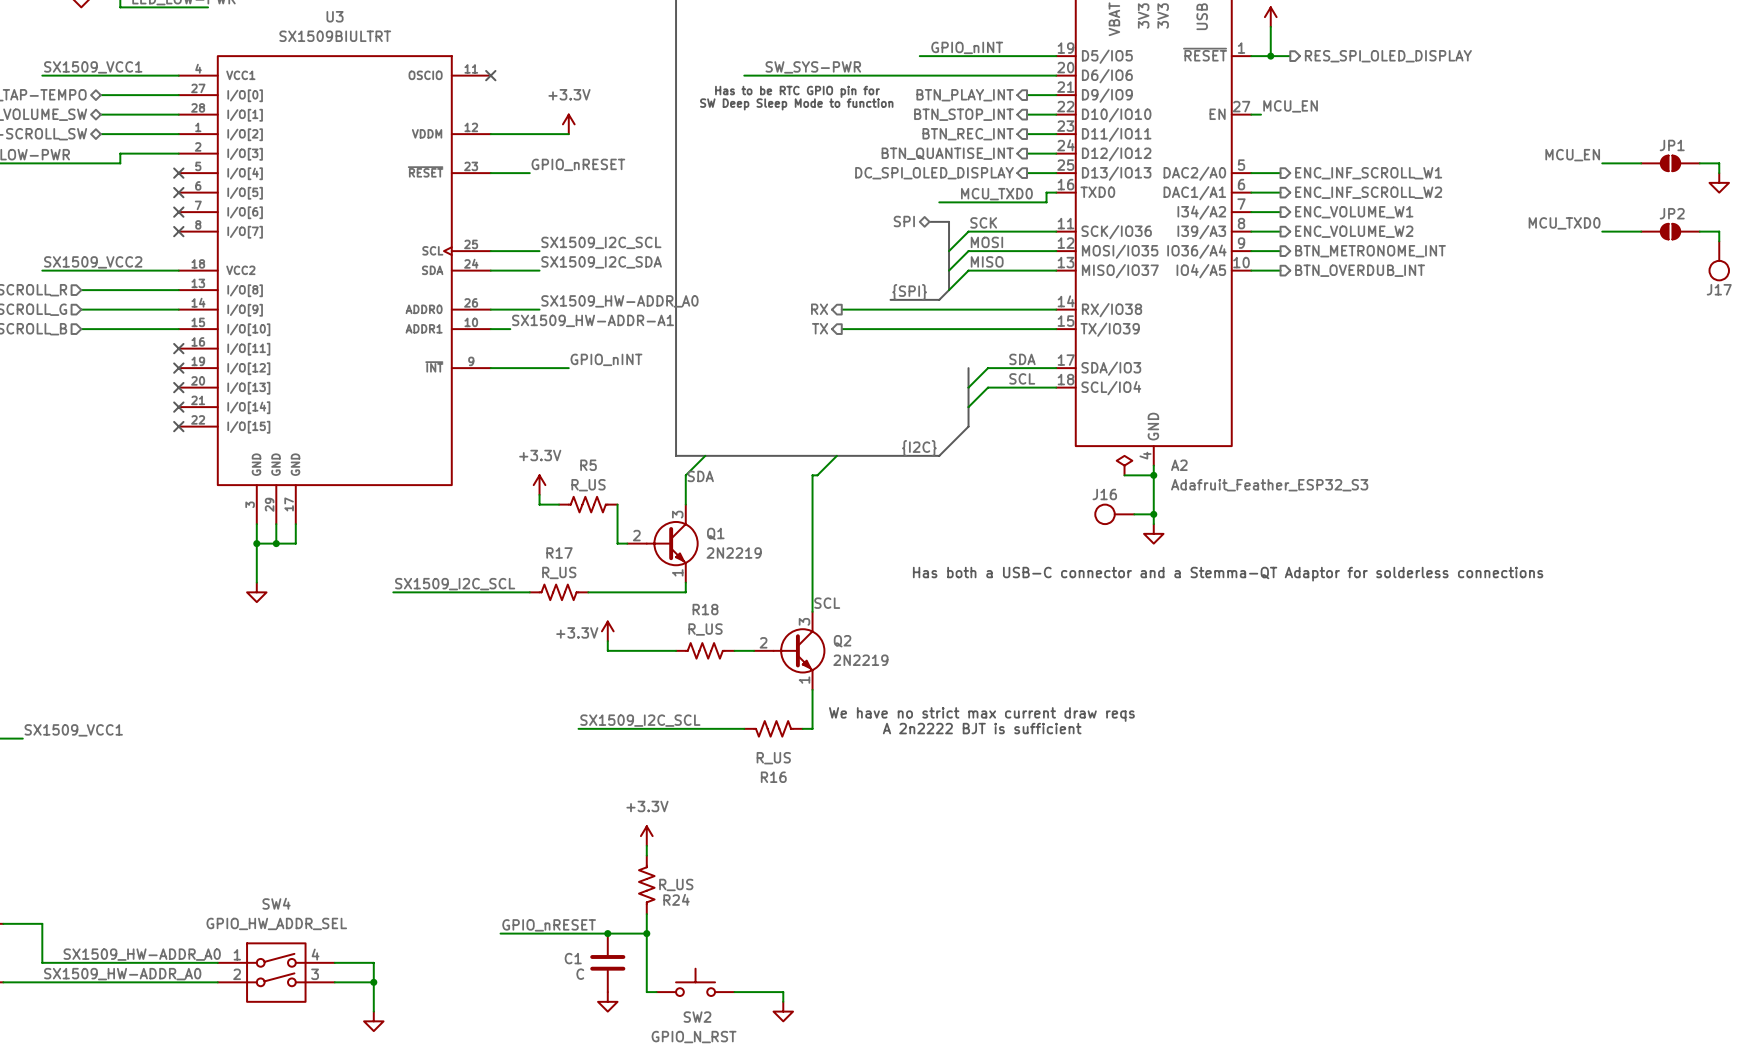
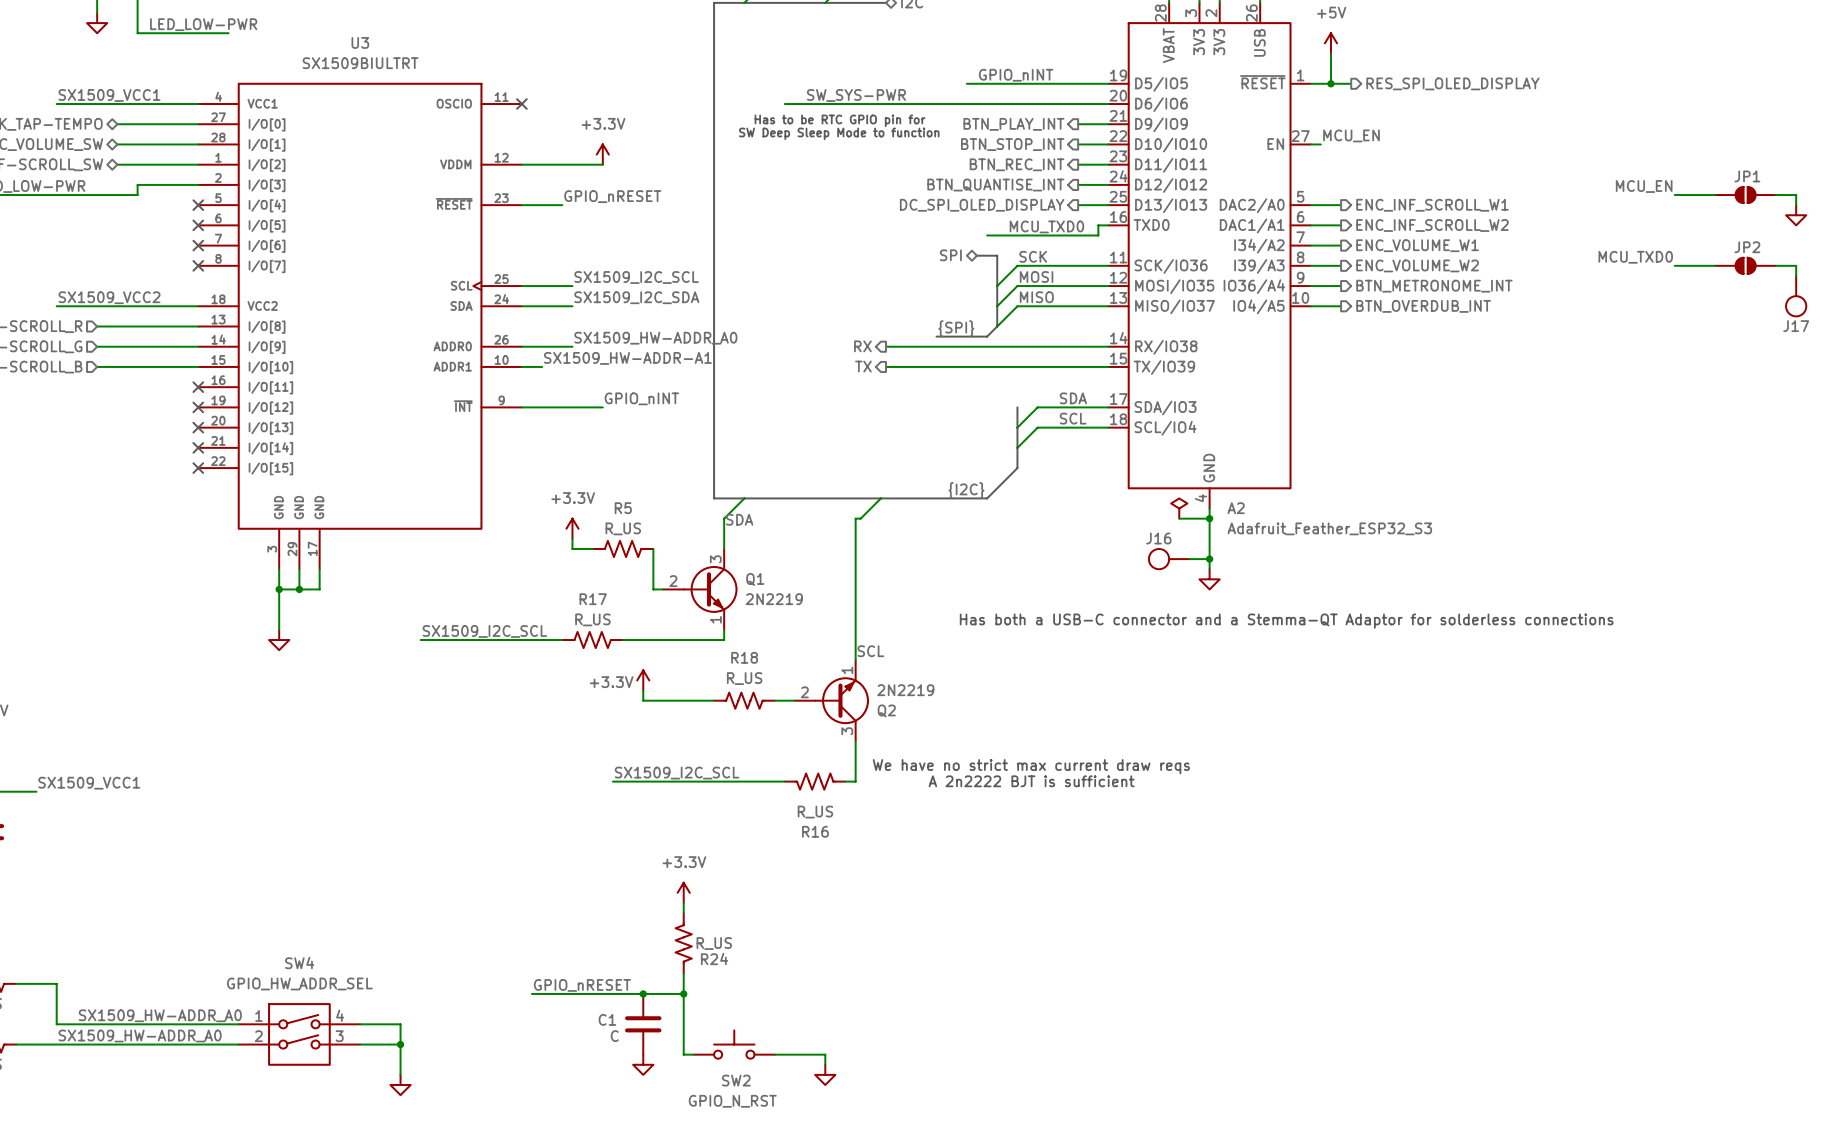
Q2 flip: as is (799, 650) -> up-down (842, 700)

